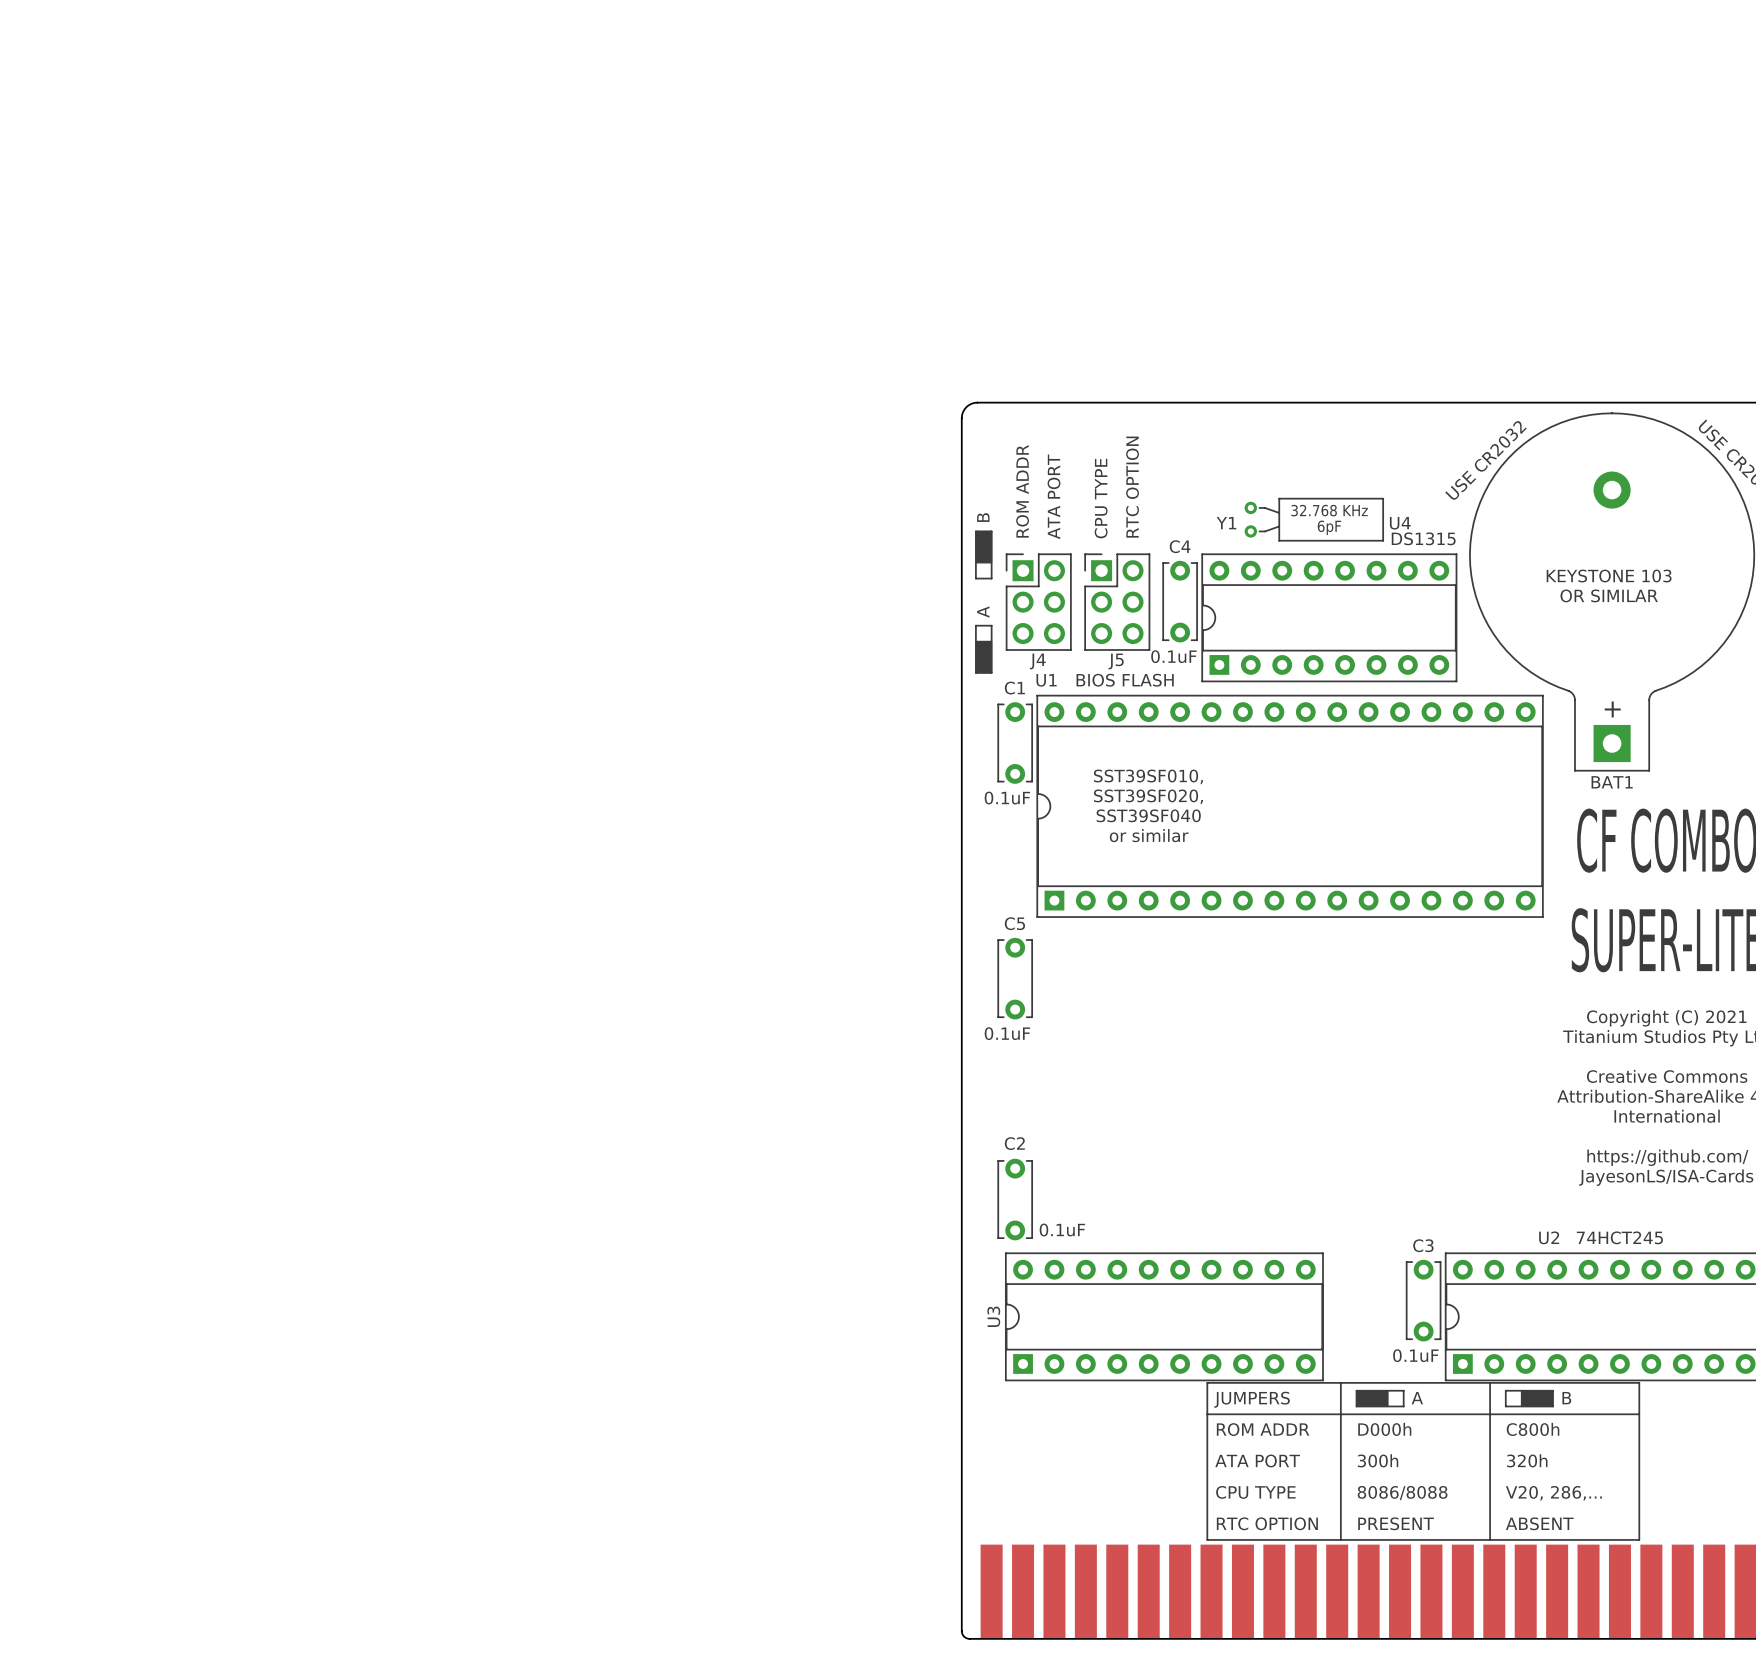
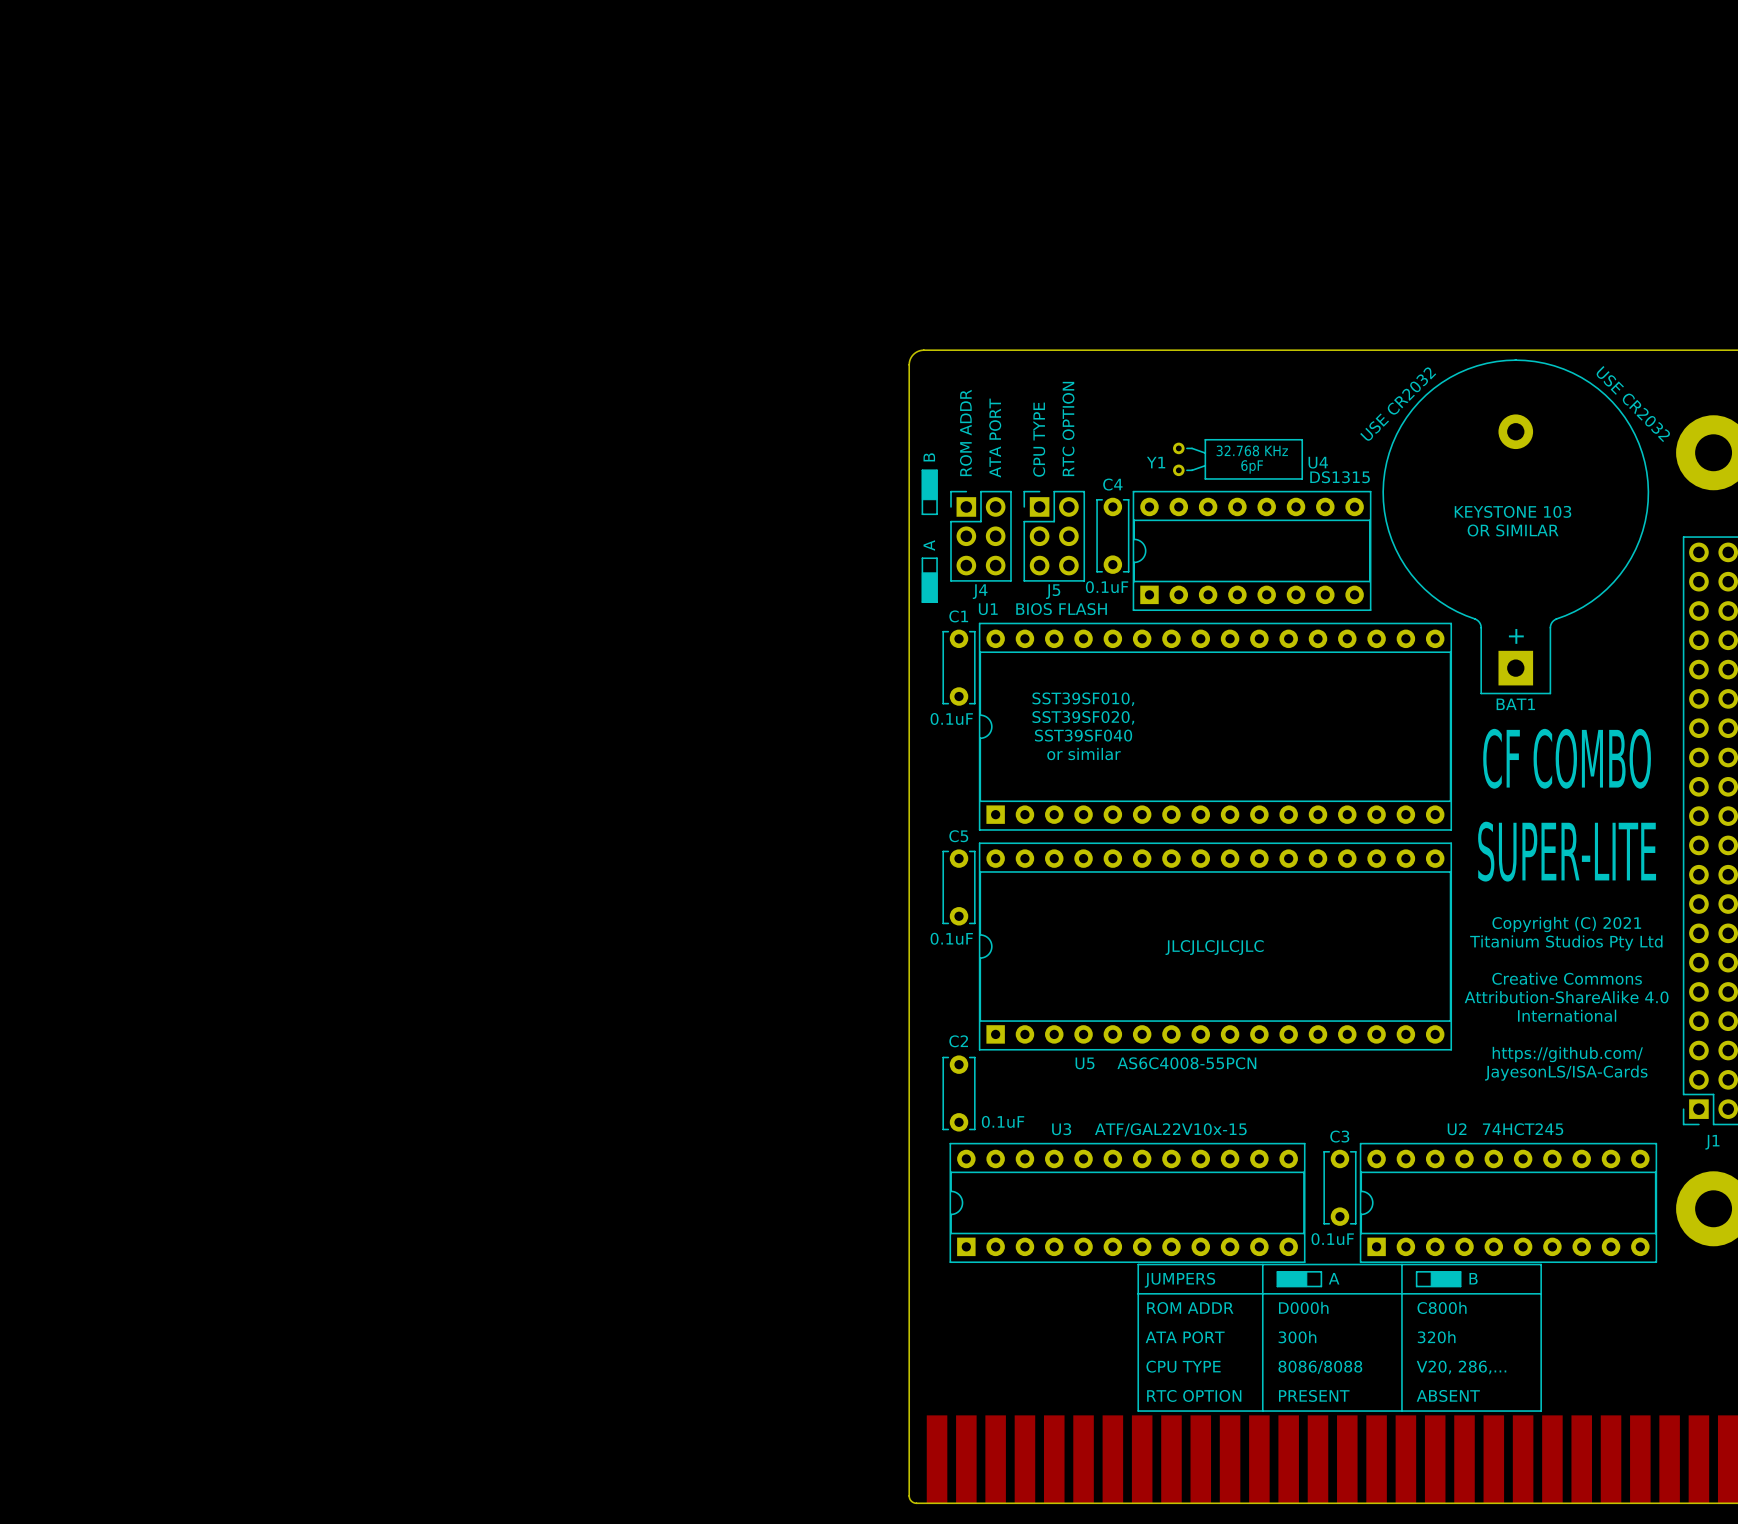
U5: none -> AS6C4008-55PCN (1215, 946)
text: none -> JLCJLCJLCJLC (1214, 947)
U3 value: none -> ATF/GAL22V10x-15 (1170, 1129)
U3 footprint: [1005, 1252, 1324, 1382] -> [949, 1142, 1306, 1263]
U3 name position: U3 (993, 1316) -> U3 (1061, 1129)

